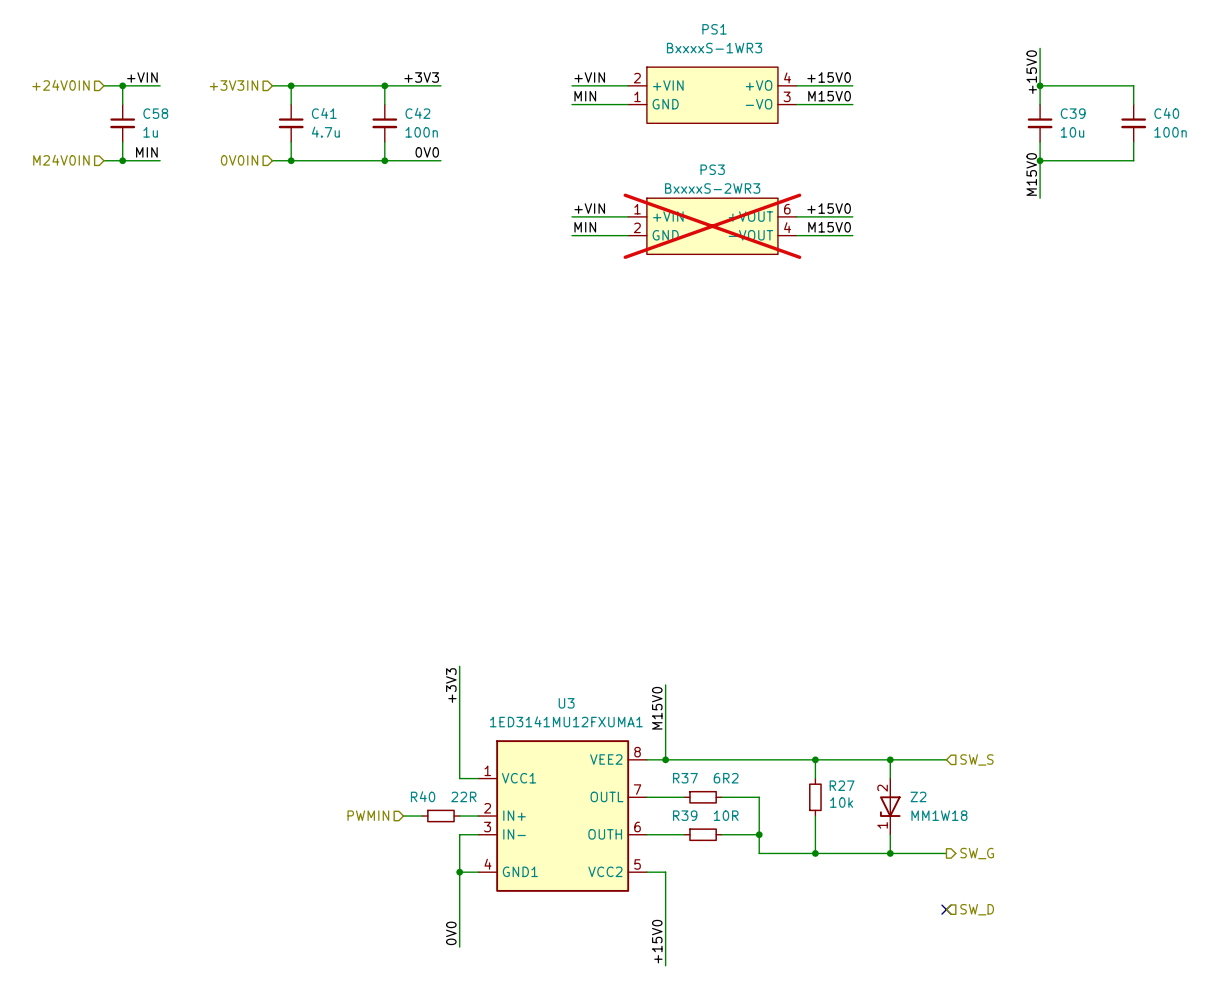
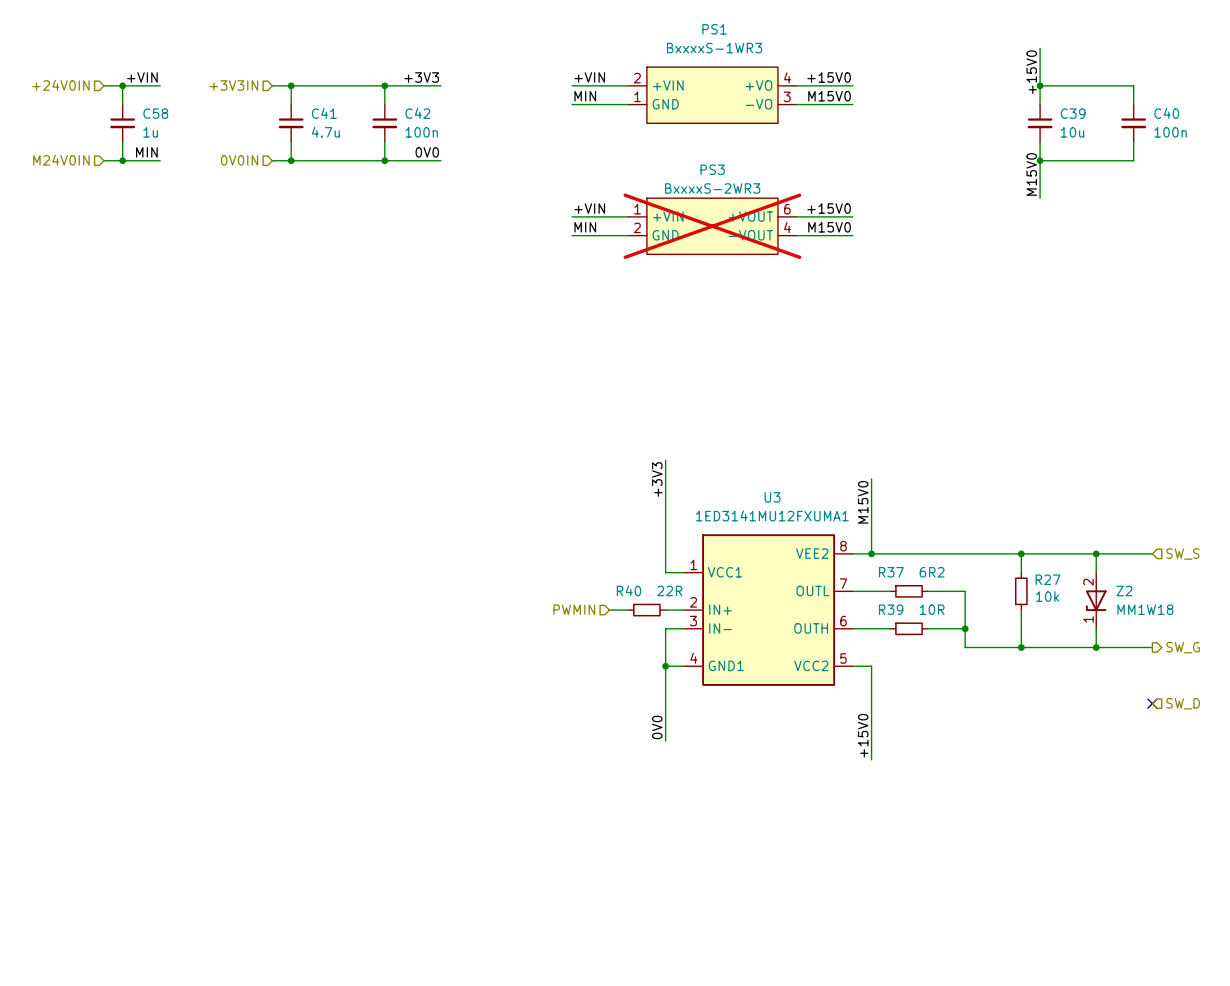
wire: none -> (665, 460) (665, 572) (684, 572)
label: none -> +3V3 (657, 479)
wire: none -> (871, 479) (871, 553)
label: none -> M15V0 (863, 502)
wire: none -> (852, 553) (1152, 553)
junction: none -> (871, 553)
wire: none -> (1021, 553) (1021, 572)
junction: none -> (1021, 553)
wire: none -> (1096, 553) (1096, 572)
junction: none -> (1096, 553)
hierarchical label: none -> SW_S (1182, 554)
wire: none -> (852, 591) (890, 591)
wire: none -> (927, 591) (965, 591) (965, 647) (1152, 647)
hierarchical label: none -> PWMIN (574, 609)
wire: none -> (609, 610) (628, 610)
wire: none -> (665, 610) (684, 610)
wire: none -> (1021, 610) (1021, 647)
wire: none -> (684, 628) (665, 628) (665, 684)
wire: none -> (852, 628) (890, 628)
wire: none -> (927, 628) (965, 628)
junction: none -> (965, 628)
wire: none -> (1096, 628) (1096, 647)
junction: none -> (1021, 647)
junction: none -> (1096, 647)
hierarchical label: none -> SW_G (1183, 647)
wire: (459, 666) (459, 778) (478, 778) -> none
wire: none -> (665, 666) (684, 666)
junction: none -> (665, 666)
wire: none -> (852, 666) (871, 666) (871, 759)
label: +3V3 (451, 685) -> none
no-connect mark: none -> (1152, 703)
hierarchical label: none -> SW_D (1183, 703)
label: M15V0 (657, 708) -> none
label: none -> 0V0 (657, 727)
label: none -> +15V0 (863, 735)
wire: (665, 741) (665, 759) -> none
wire: (646, 759) (946, 759) -> none
junction: (665, 759) -> none
wire: (815, 759) (815, 778) -> none
junction: (815, 759) -> none
wire: (890, 759) (890, 778) -> none
junction: (890, 759) -> none
hierarchical label: SW_S (976, 759) -> none
wire: (646, 797) (684, 797) -> none
R37 position: (703, 797) -> (909, 591)
wire: (721, 797) (759, 797) (759, 853) (946, 853) -> none
R27 position: (815, 797) -> (1021, 591)
Z2 position: (890, 806) -> (1096, 600)
hierarchical label: PWMIN (368, 815) -> none
wire: (403, 816) (422, 816) -> none
R40 position: (440, 816) -> (646, 610)
wire: (459, 816) (478, 816) -> none
U3 position: (562, 816) -> (768, 610)
wire: (815, 816) (815, 853) -> none
wire: (478, 834) (459, 834) (459, 947) -> none
wire: (646, 834) (684, 834) -> none
R39 position: (703, 834) -> (909, 628)
wire: (721, 834) (759, 834) -> none
junction: (759, 834) -> none
wire: (890, 834) (890, 853) -> none
junction: (815, 853) -> none
junction: (890, 853) -> none
hierarchical label: SW_G (977, 853) -> none
wire: (459, 872) (478, 872) -> none
junction: (459, 872) -> none
wire: (646, 872) (665, 872) (665, 965) -> none
no-connect mark: (946, 909) -> none
hierarchical label: SW_D (977, 909) -> none
label: 0V0 (451, 933) -> none
label: +15V0 (657, 941) -> none

